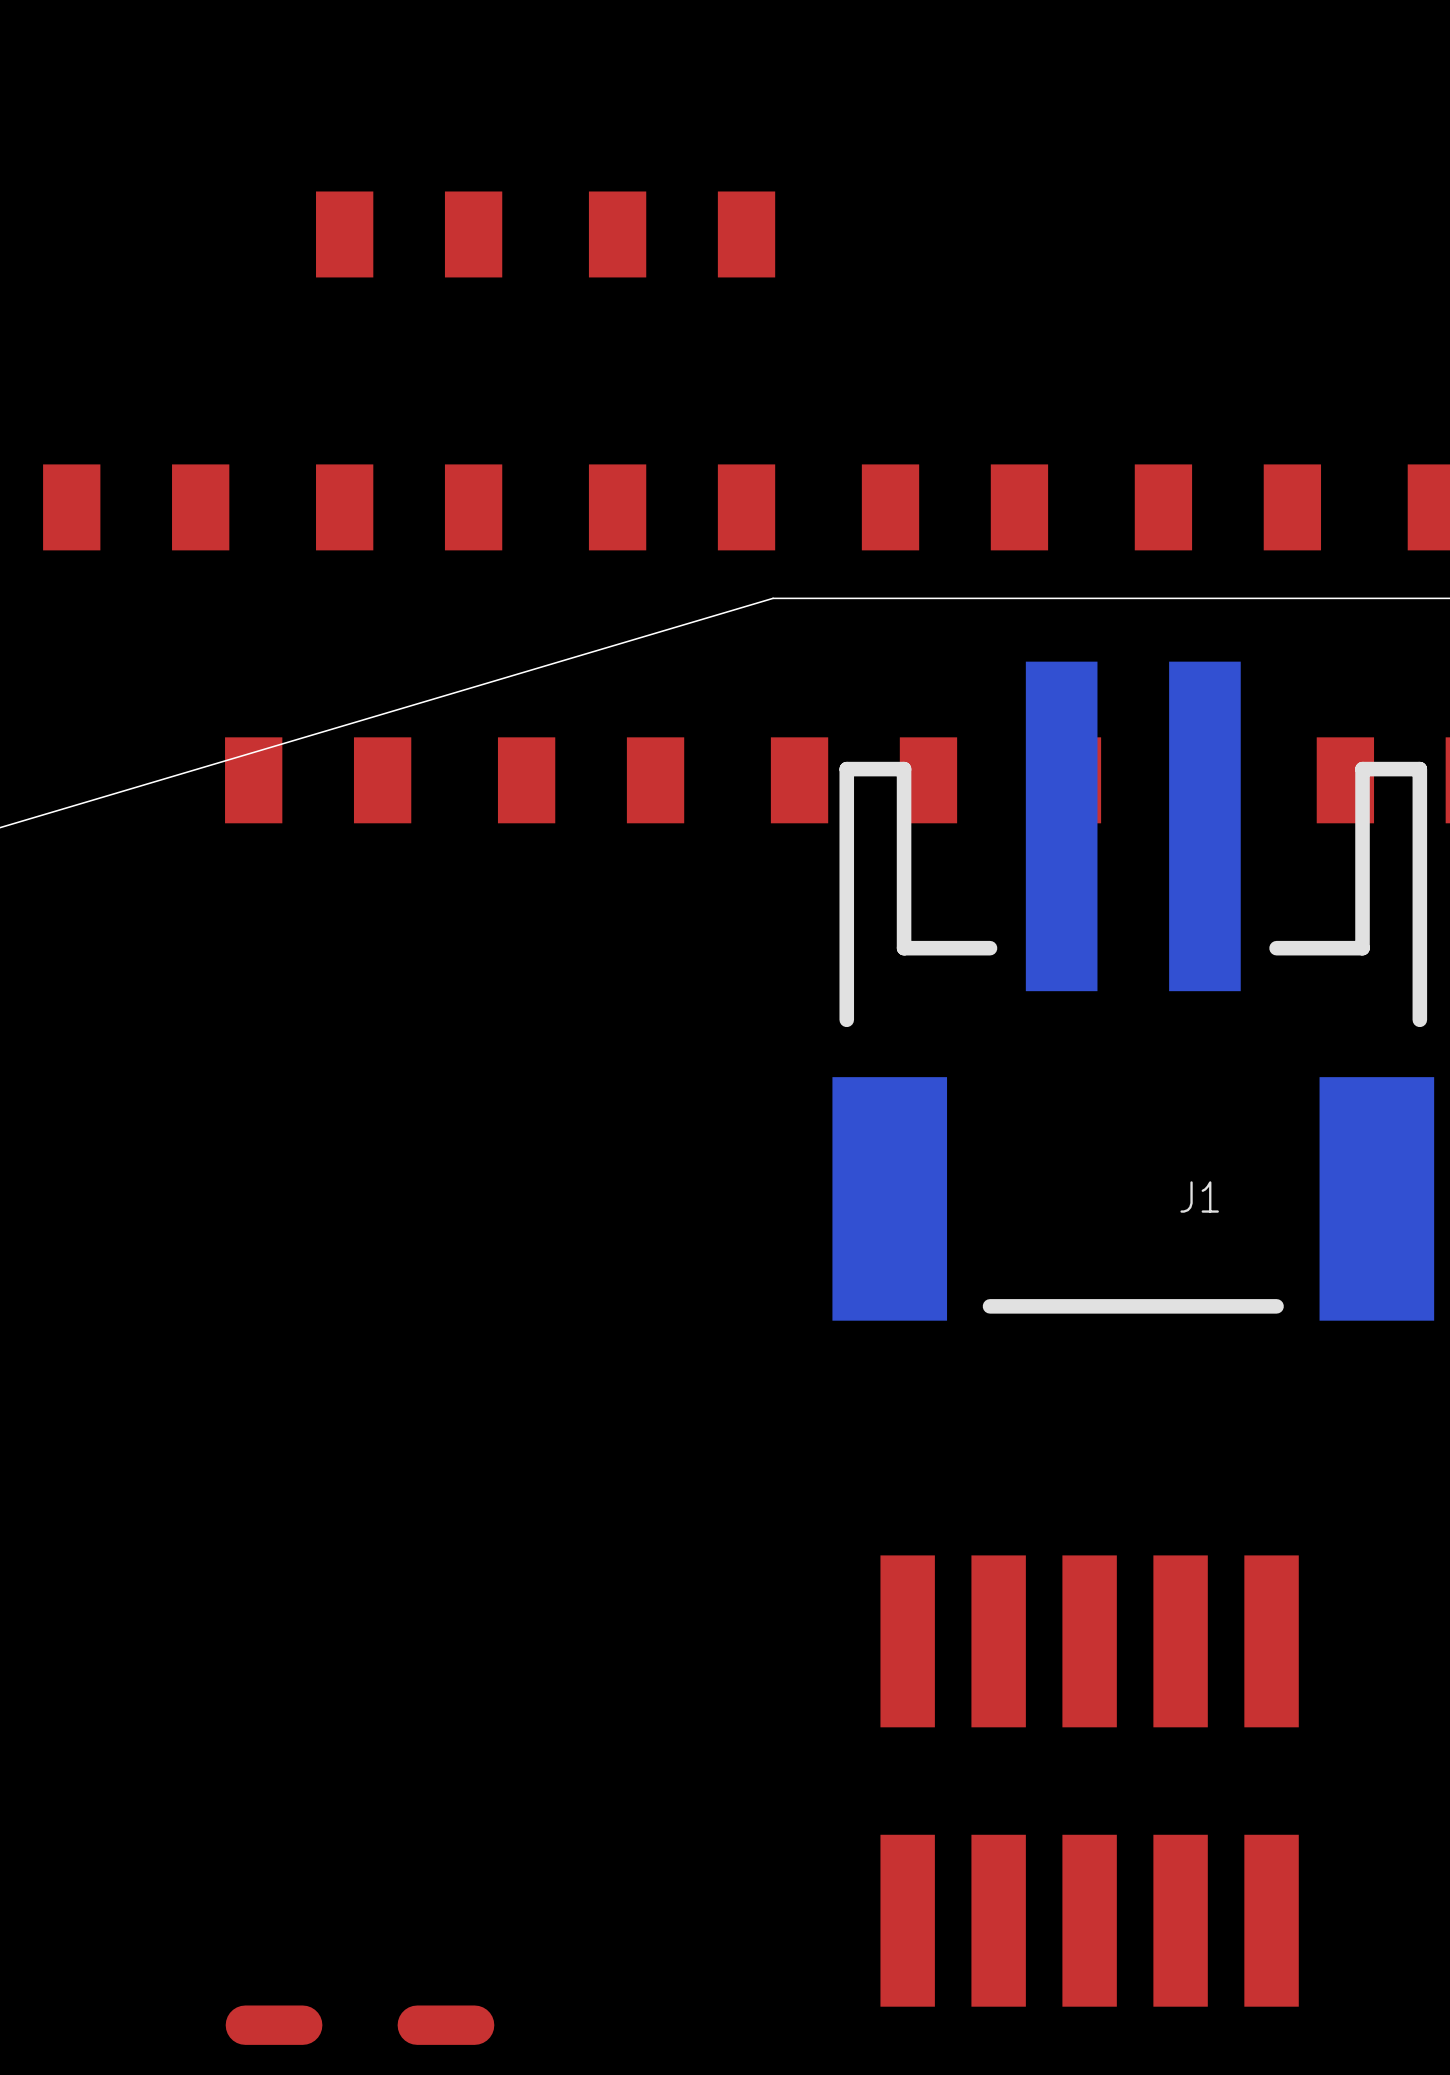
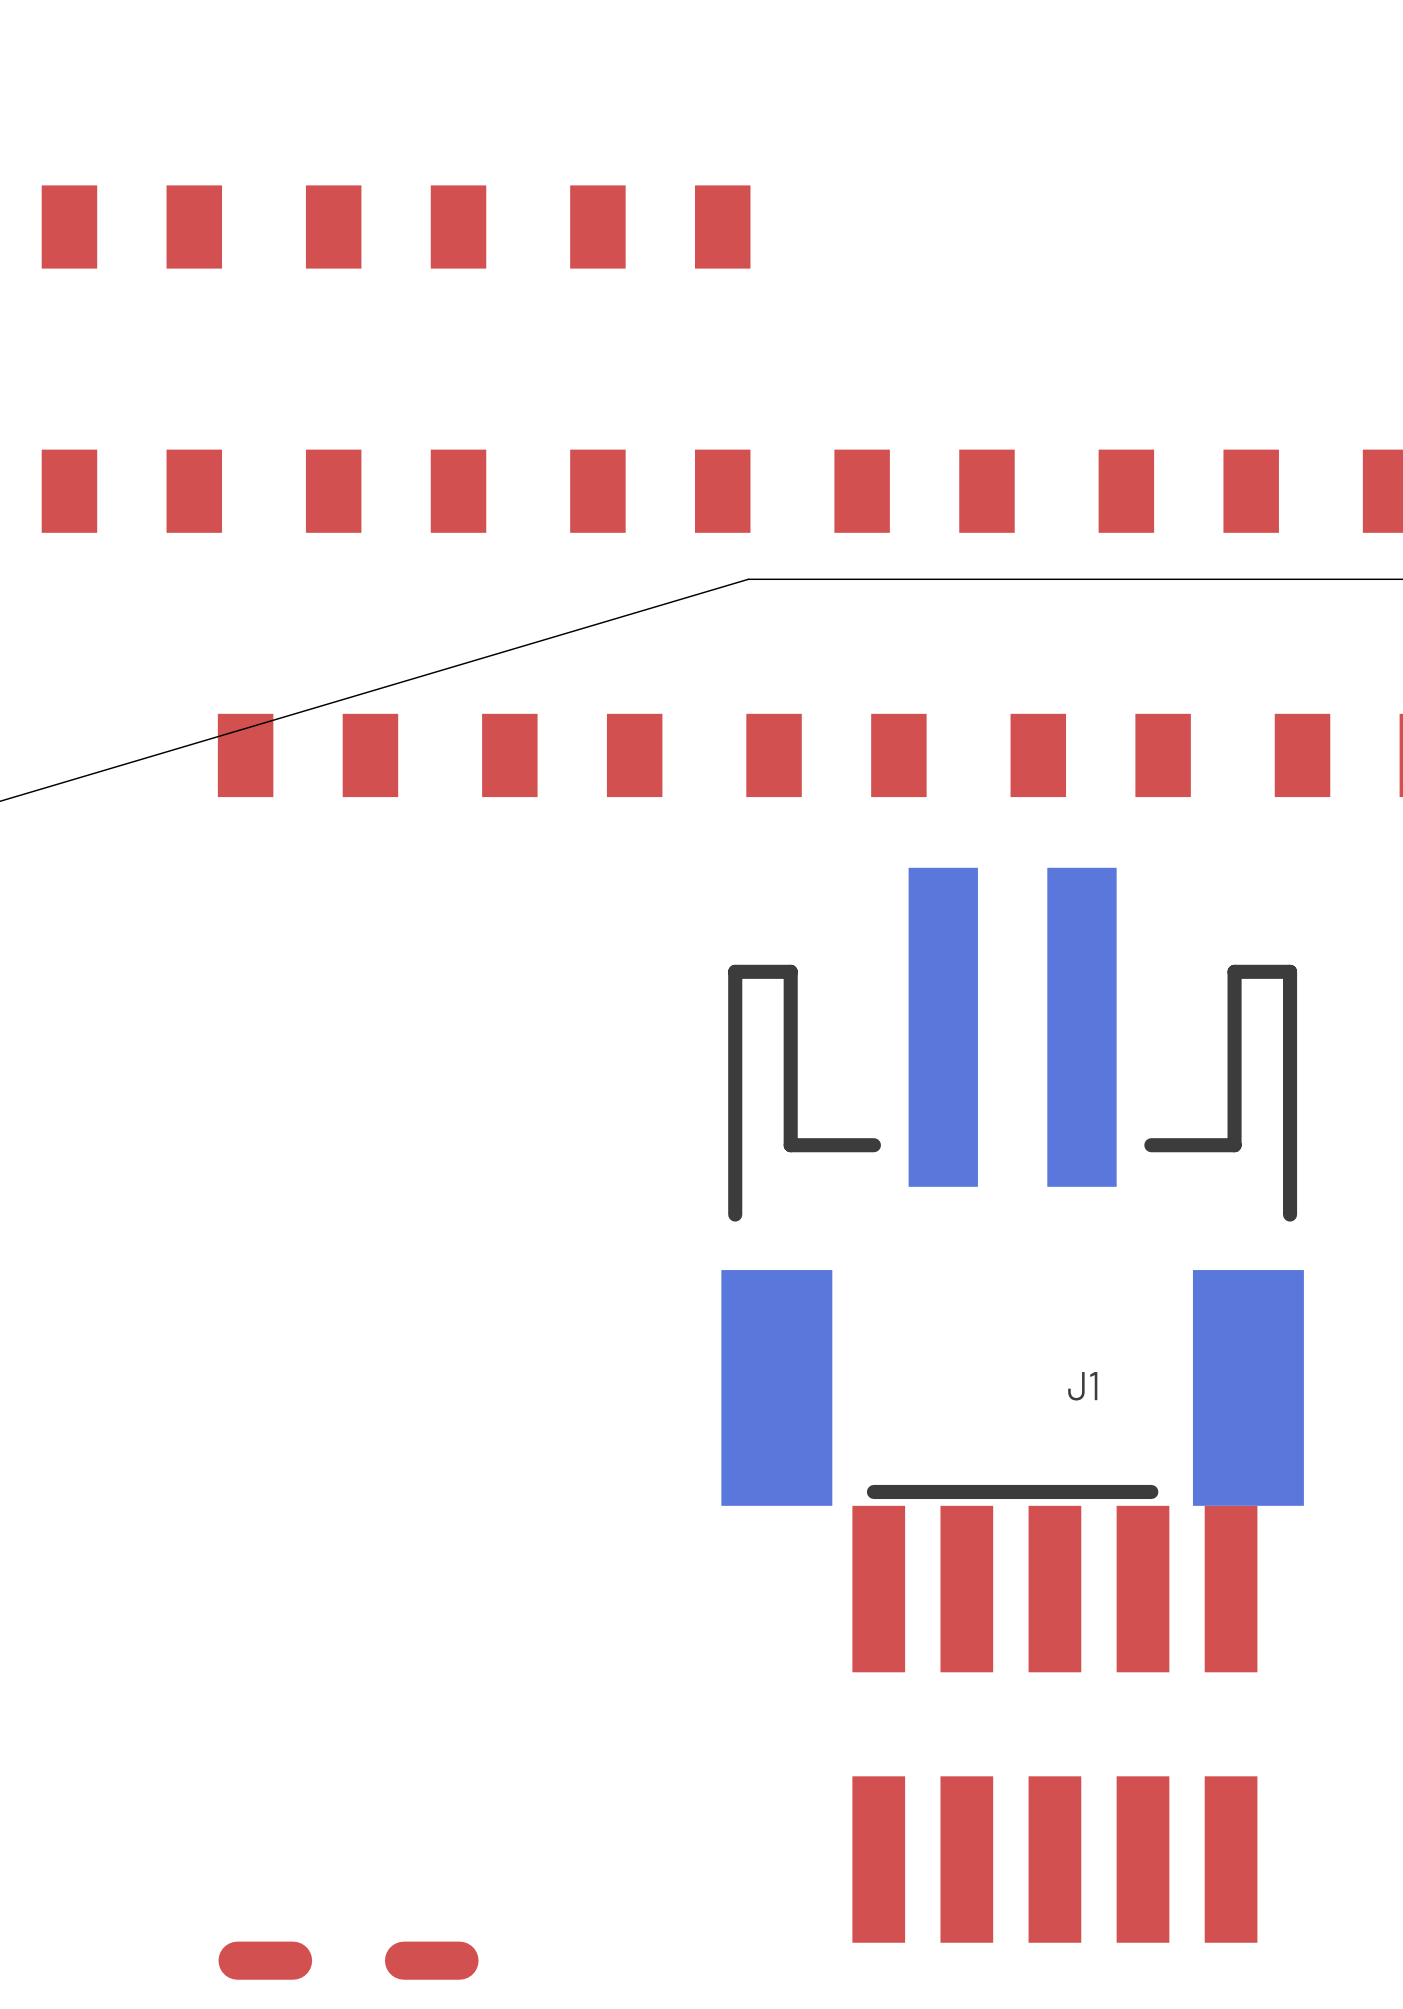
part: none -> (131, 227)
J1 position: (1133, 991) -> (1012, 1186)

